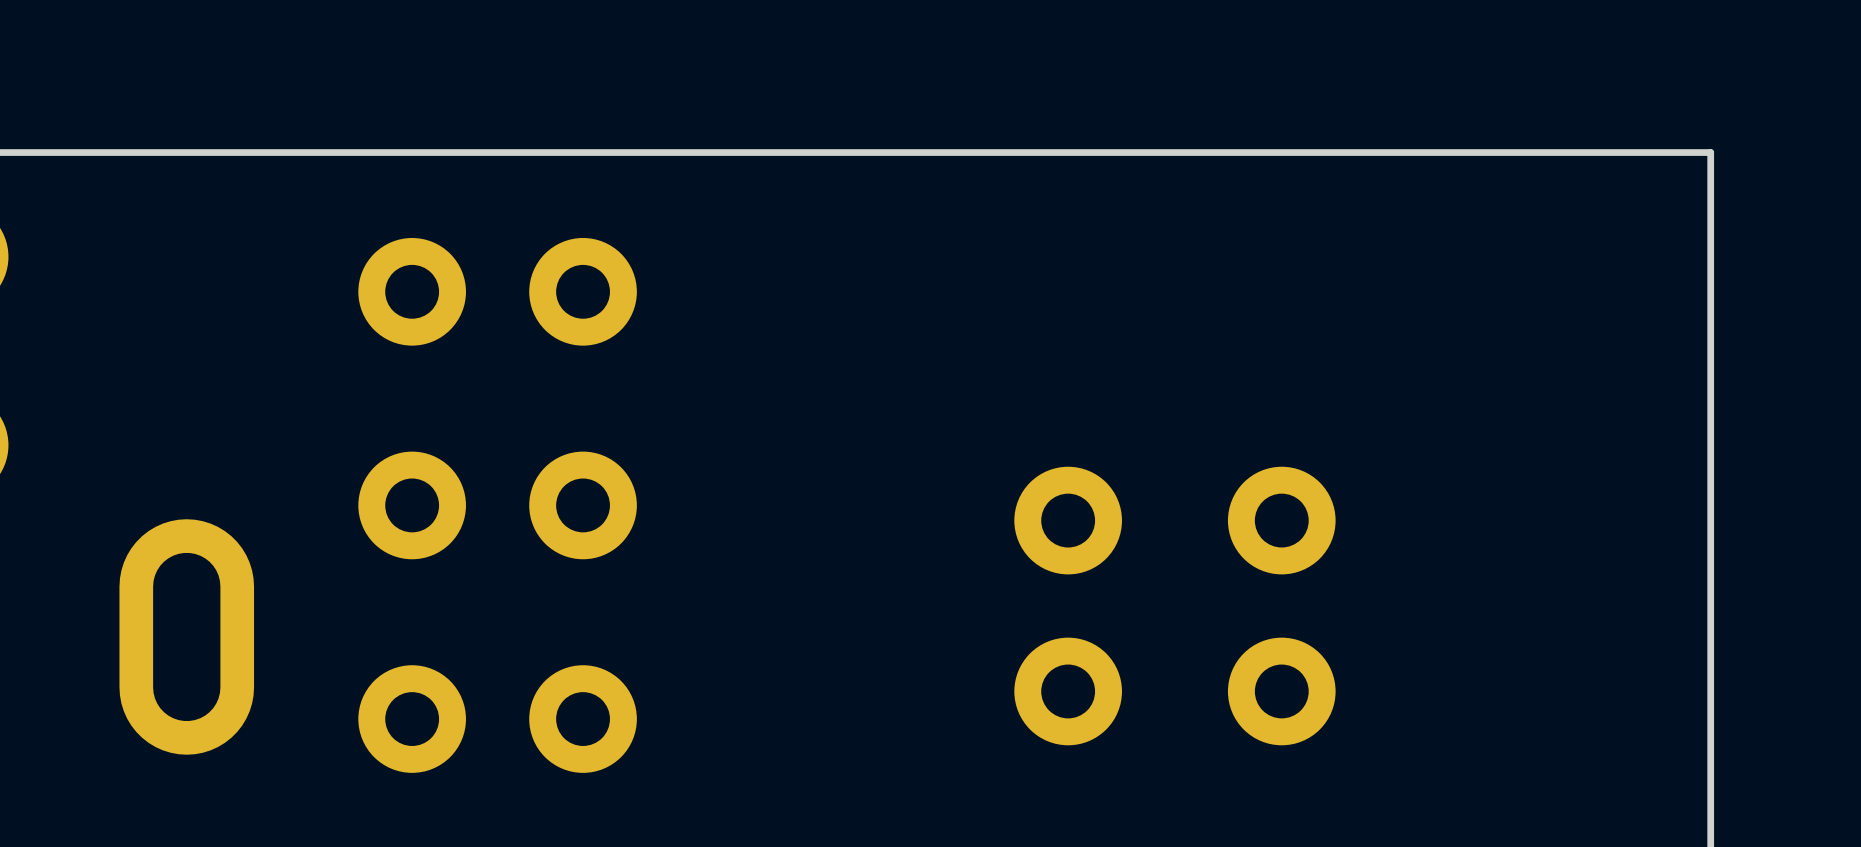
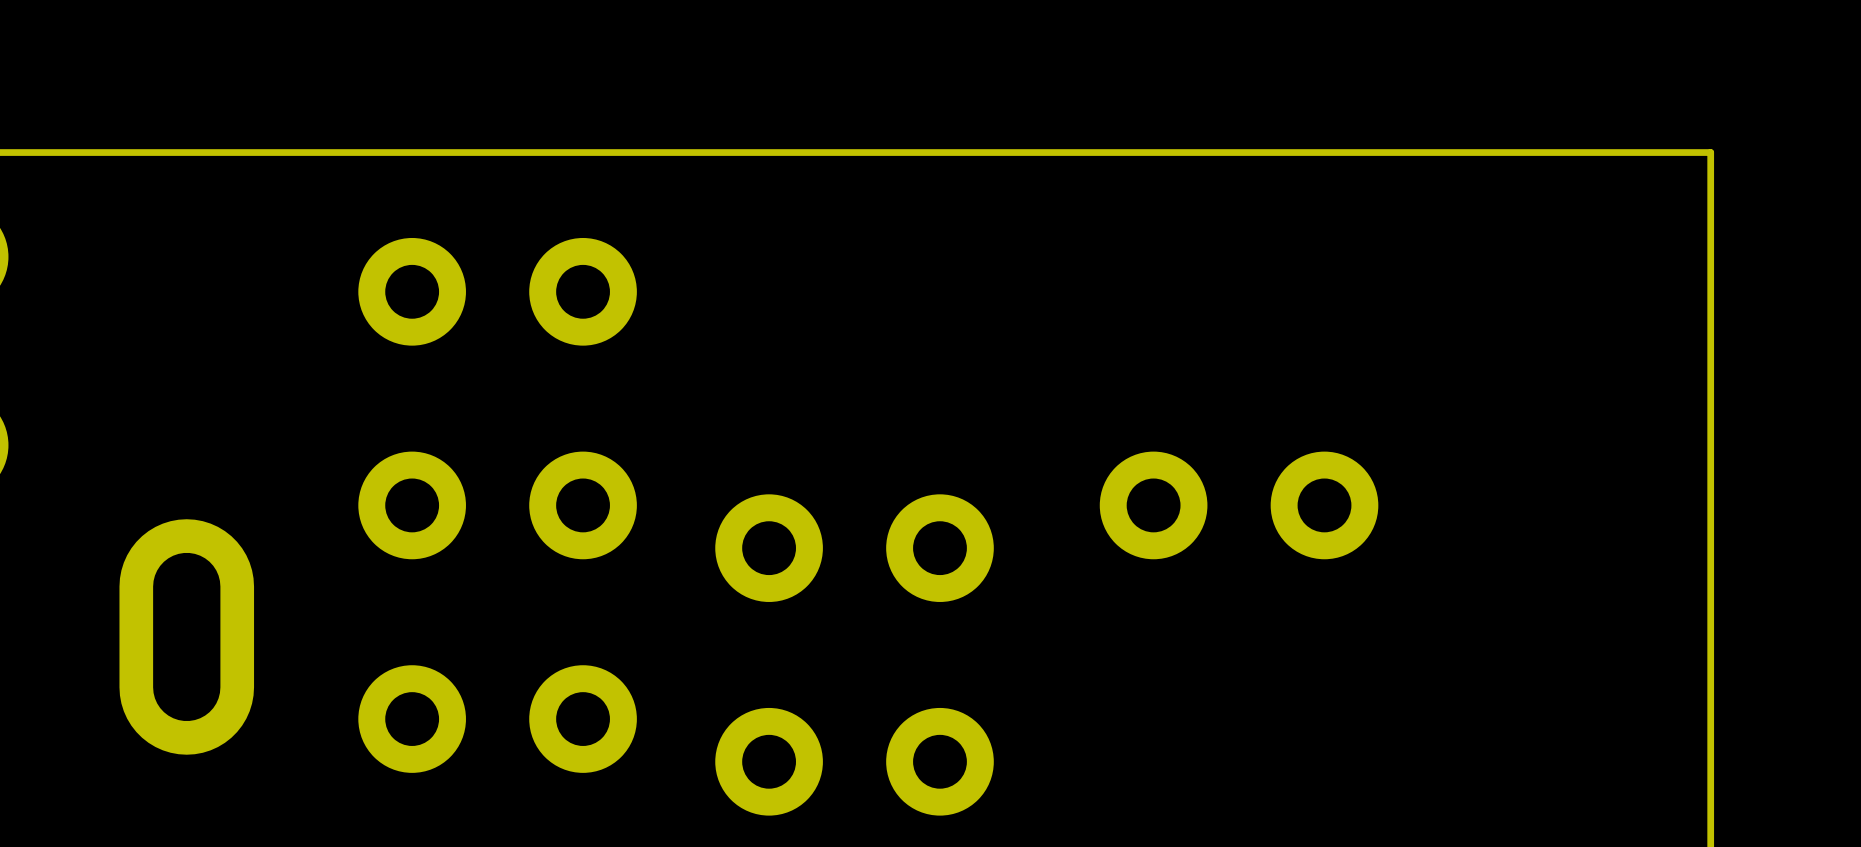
part: none -> (1239, 505)
part: none -> (854, 548)
part: (1068, 606) -> none
part: (1281, 606) -> none
part: none -> (854, 761)

